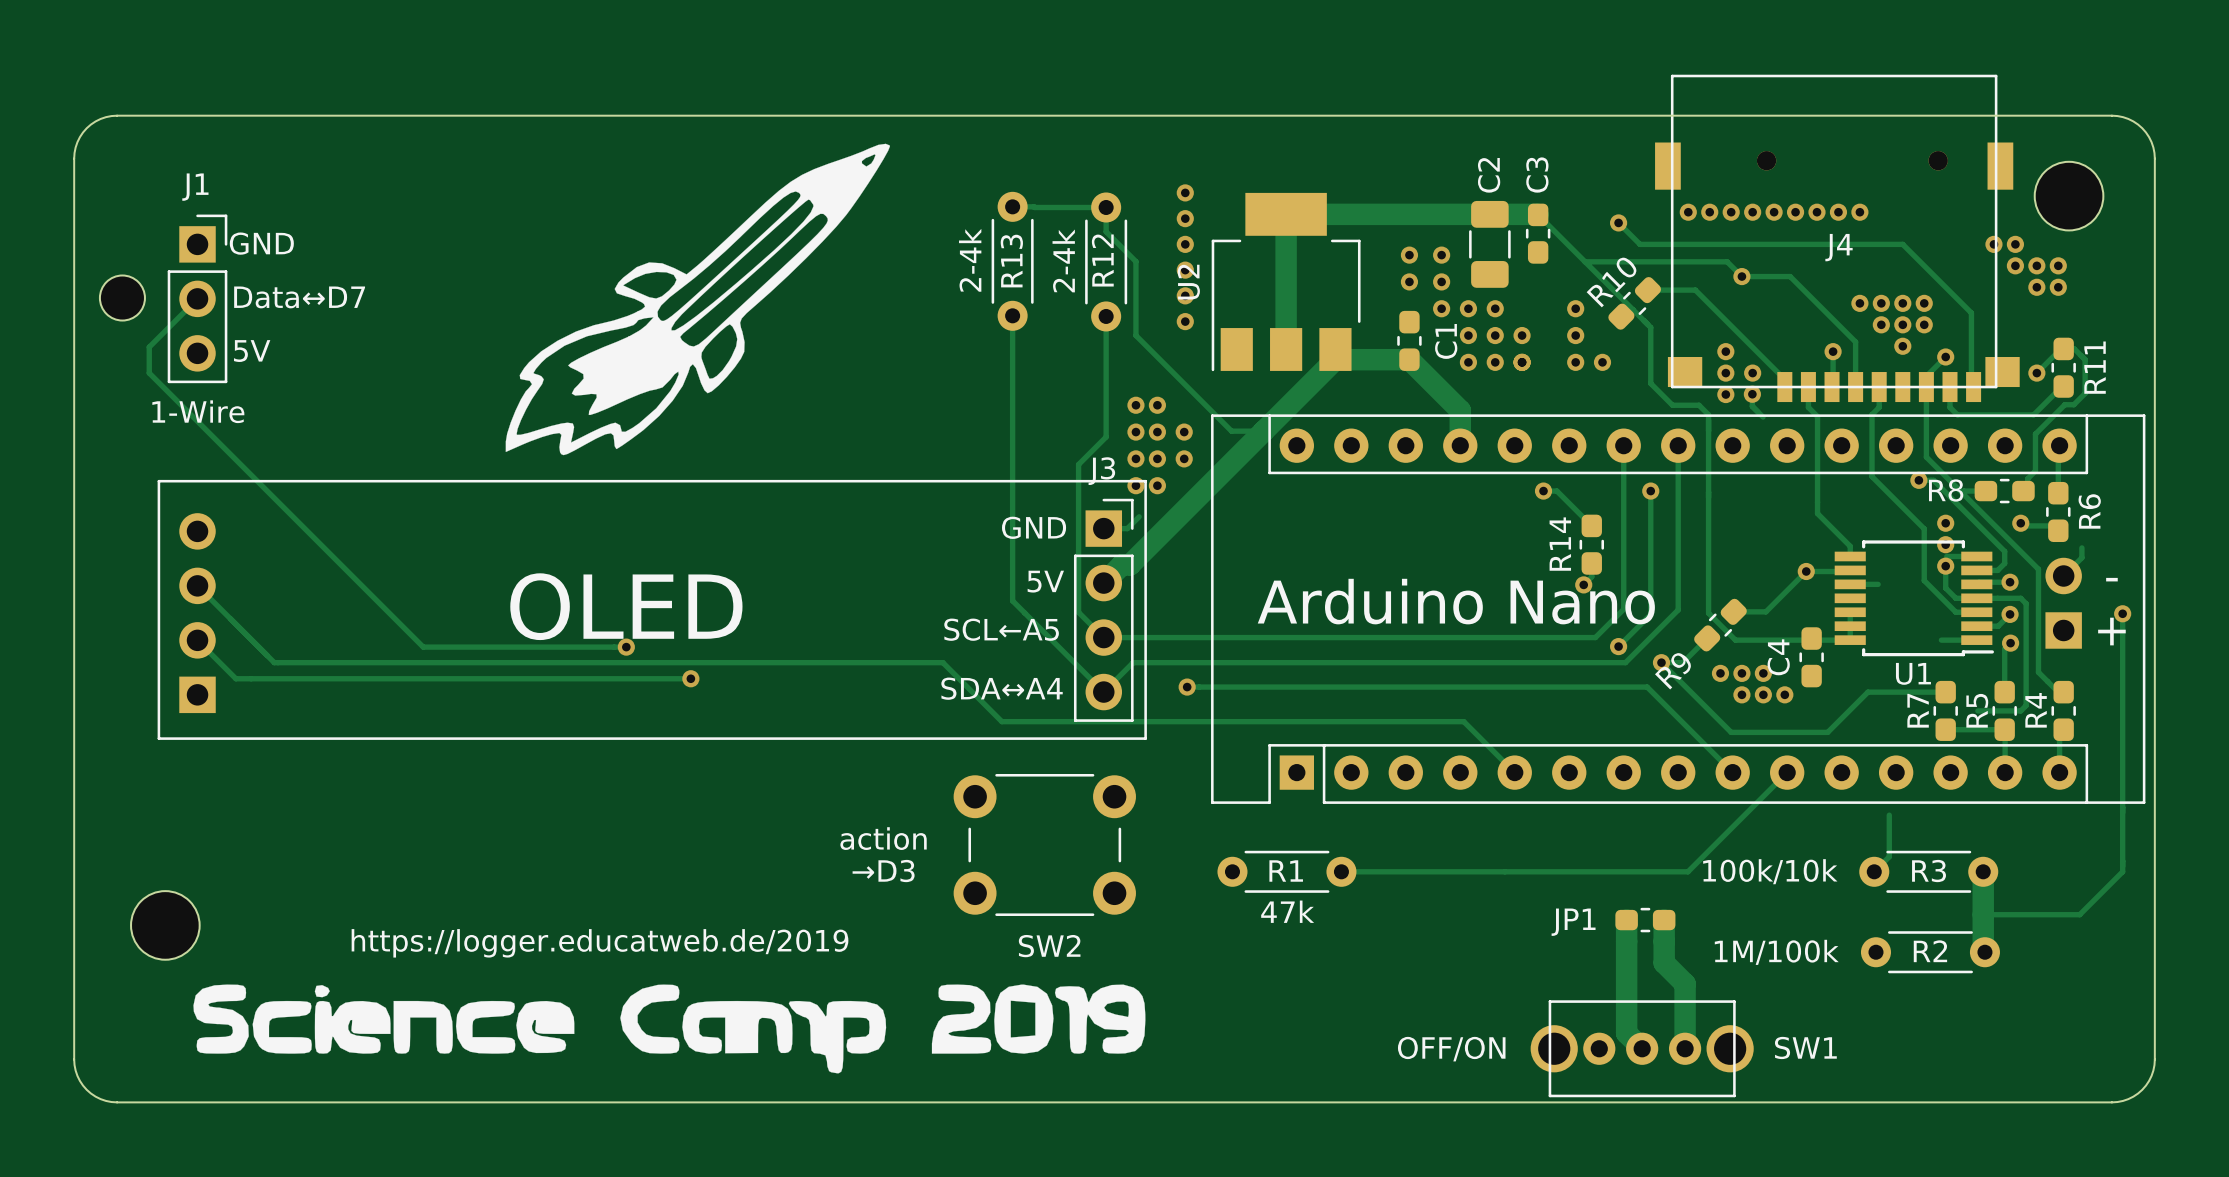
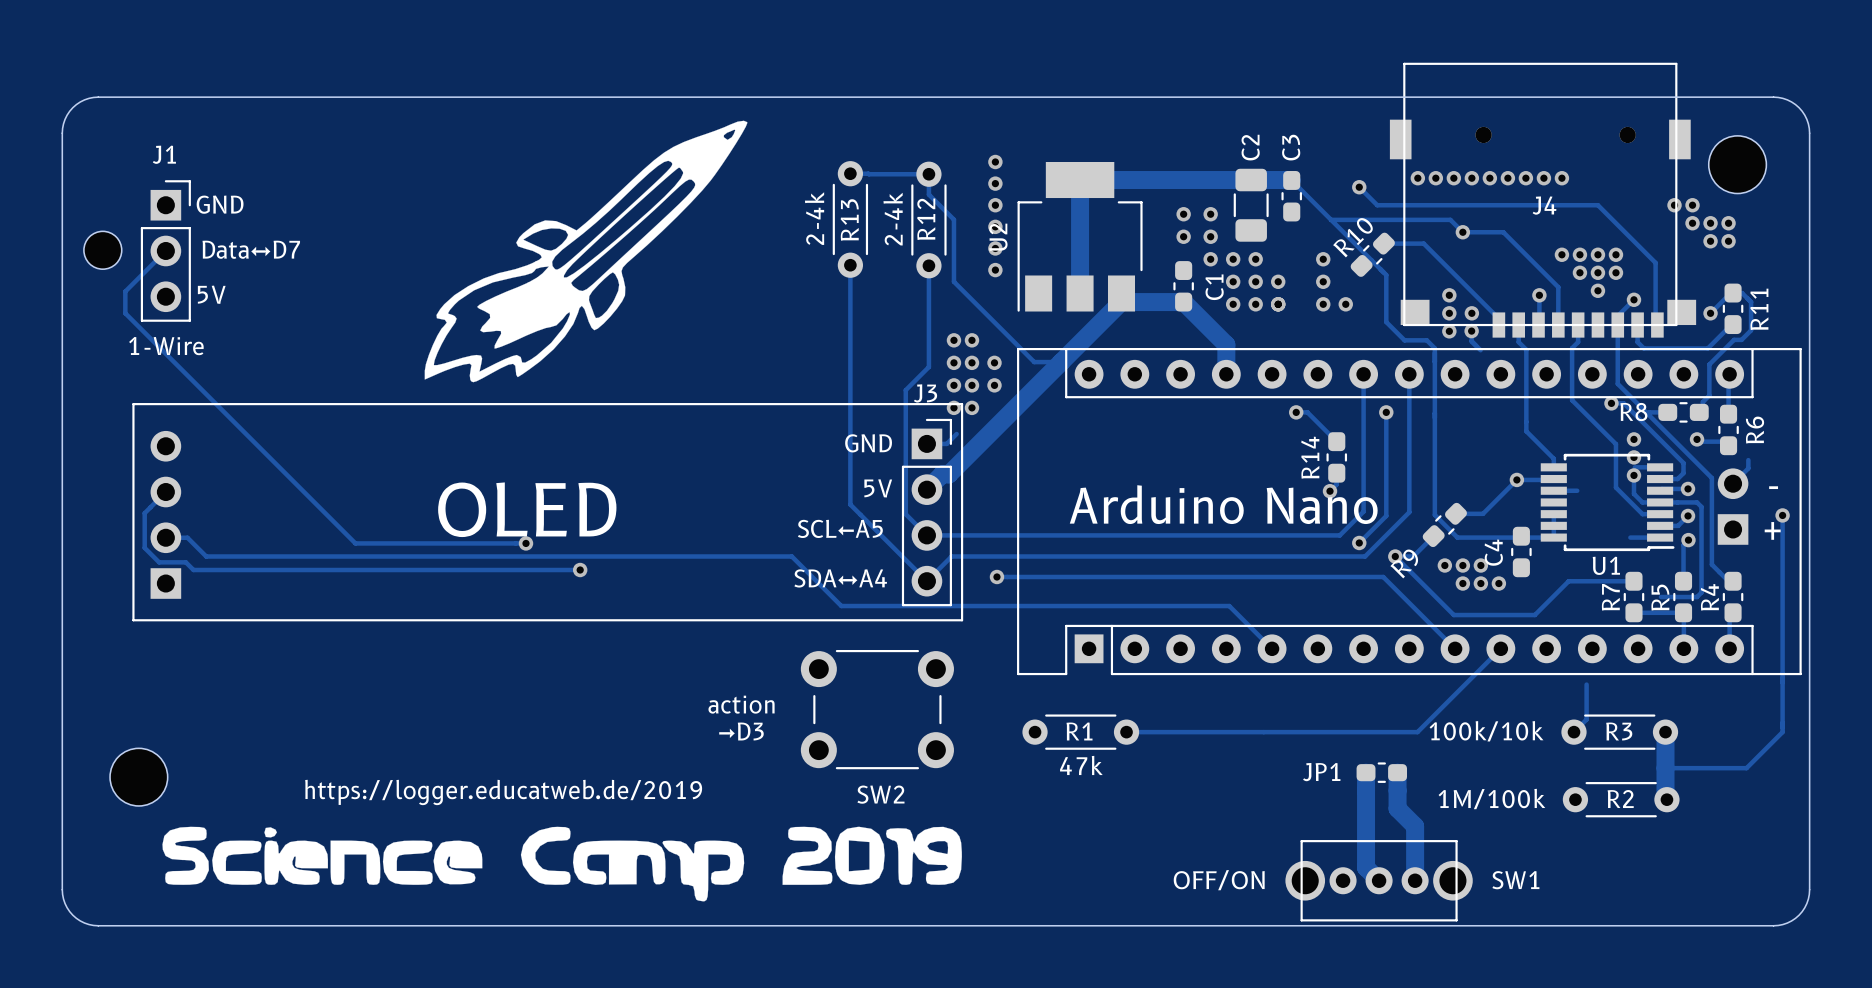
track: (197, 585) (274, 662) -> (165, 492) (144, 513) (144, 547) (159, 562) (185, 562) (193, 570) (198, 570)
track: (197, 640) (235, 678) -> (165, 537) (187, 537) (206, 556) (230, 556)

